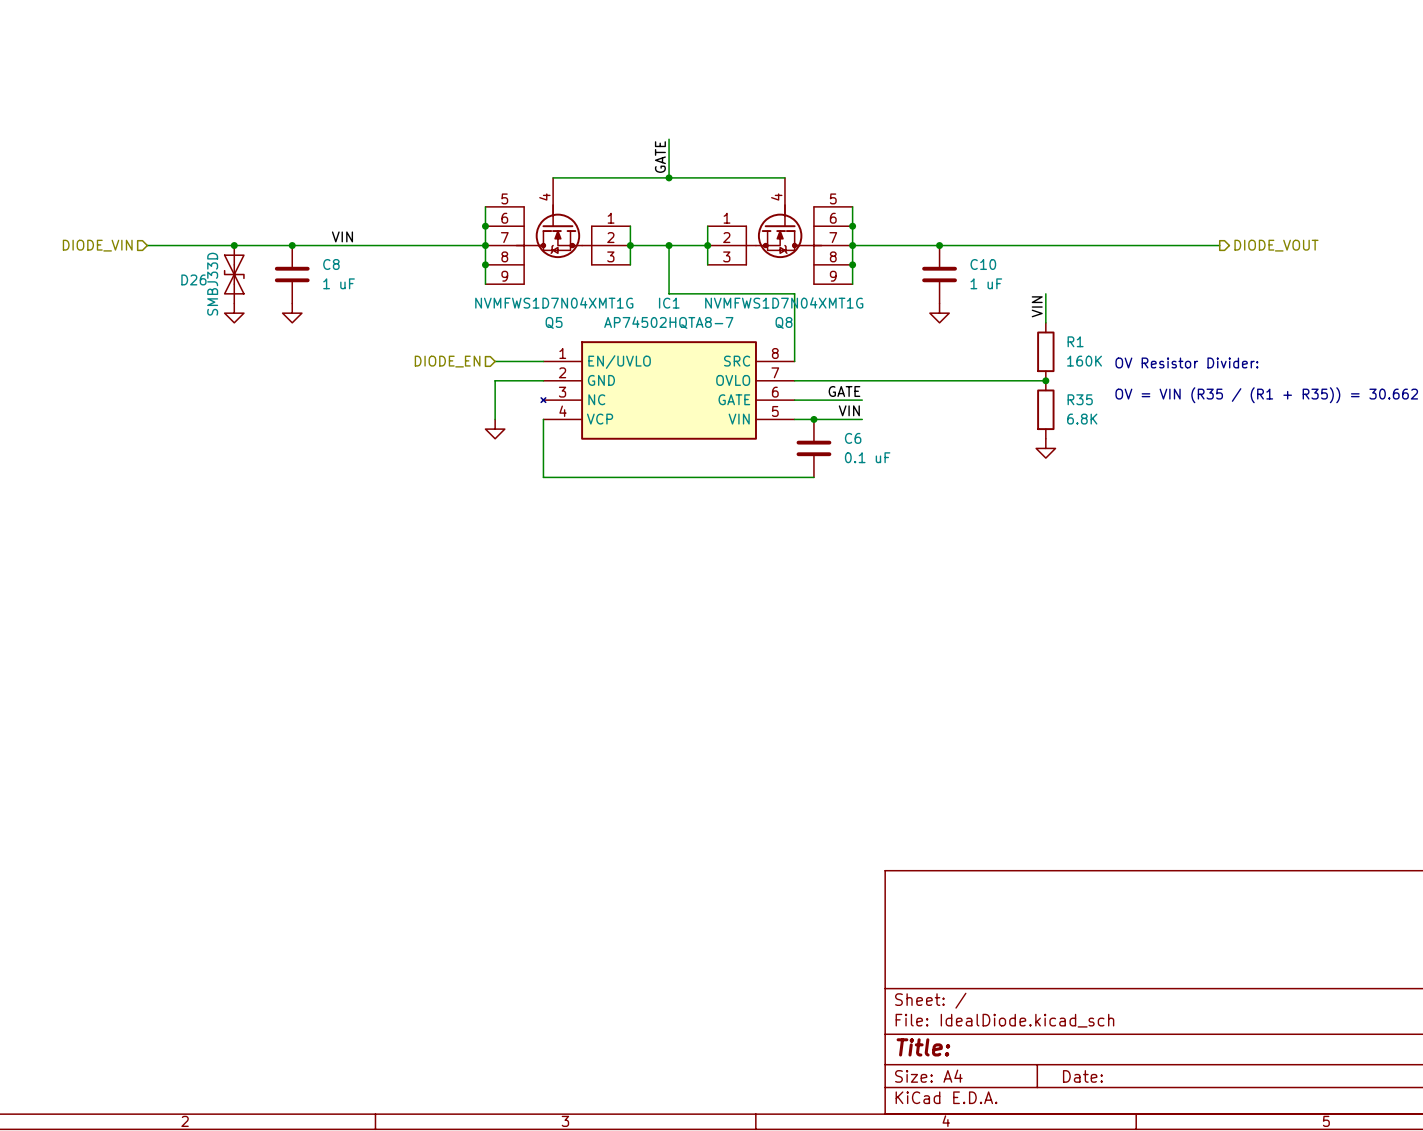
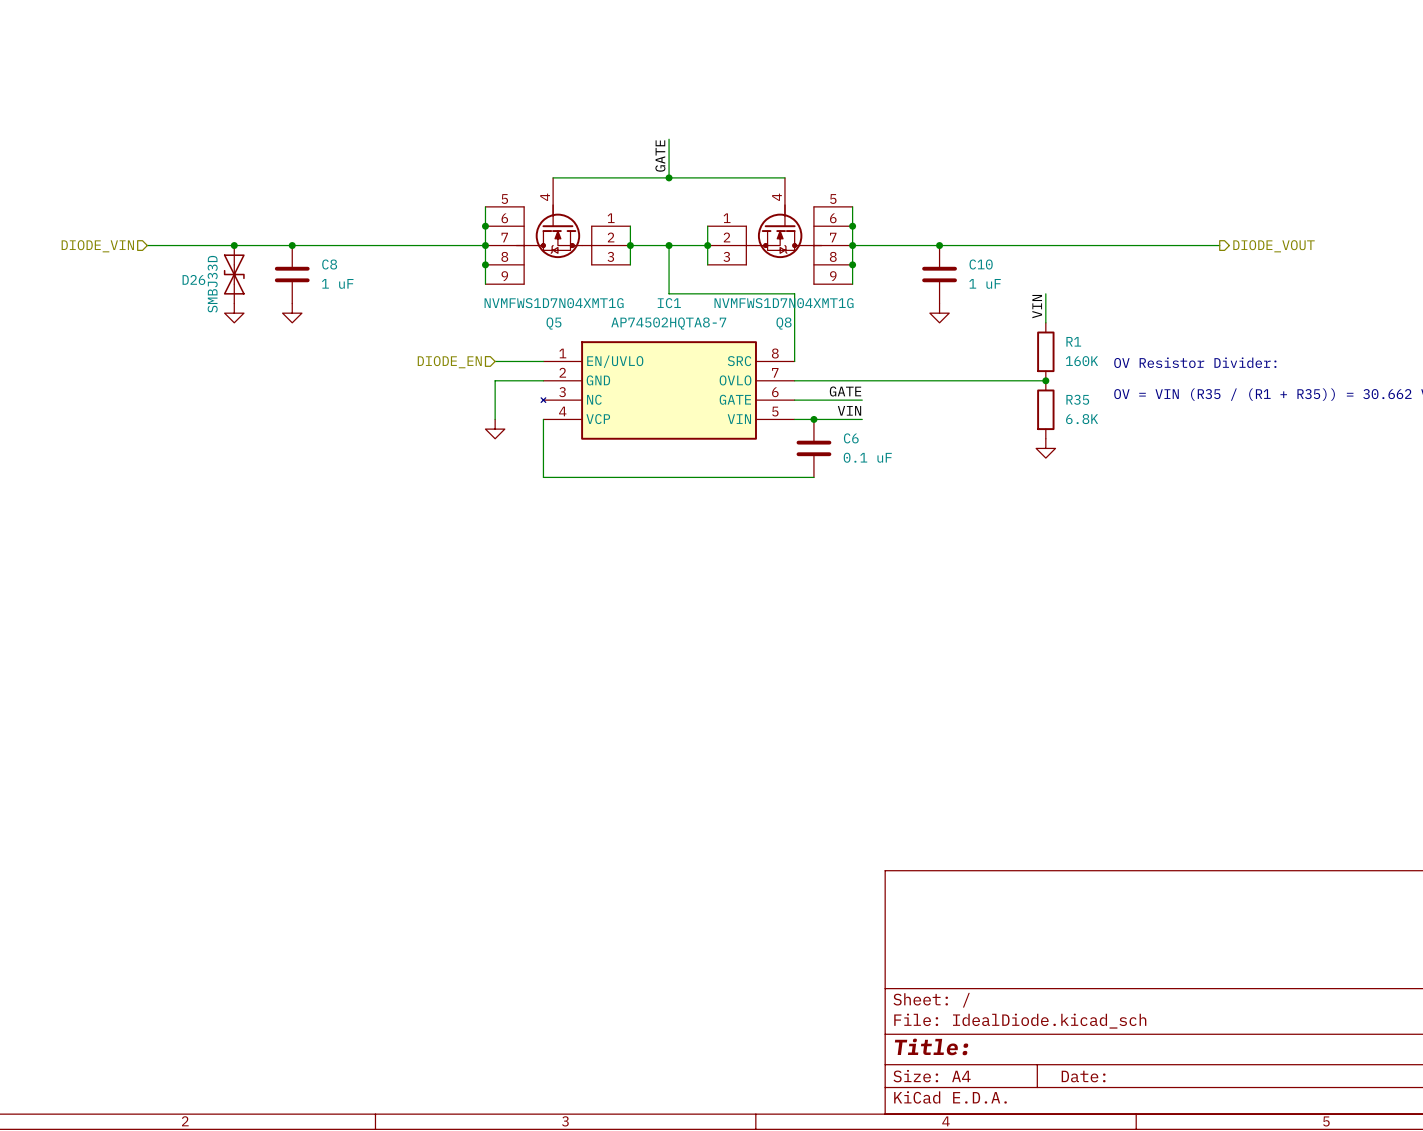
label: VIN (342, 236) -> none

